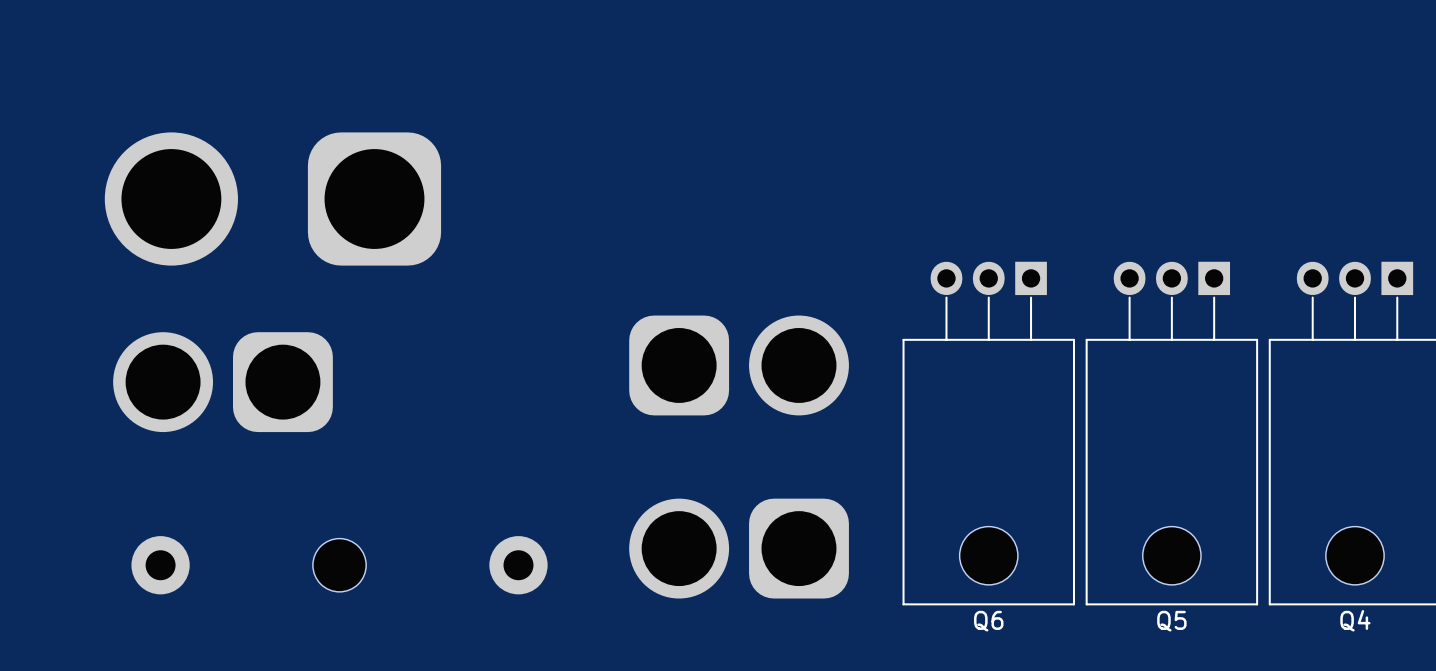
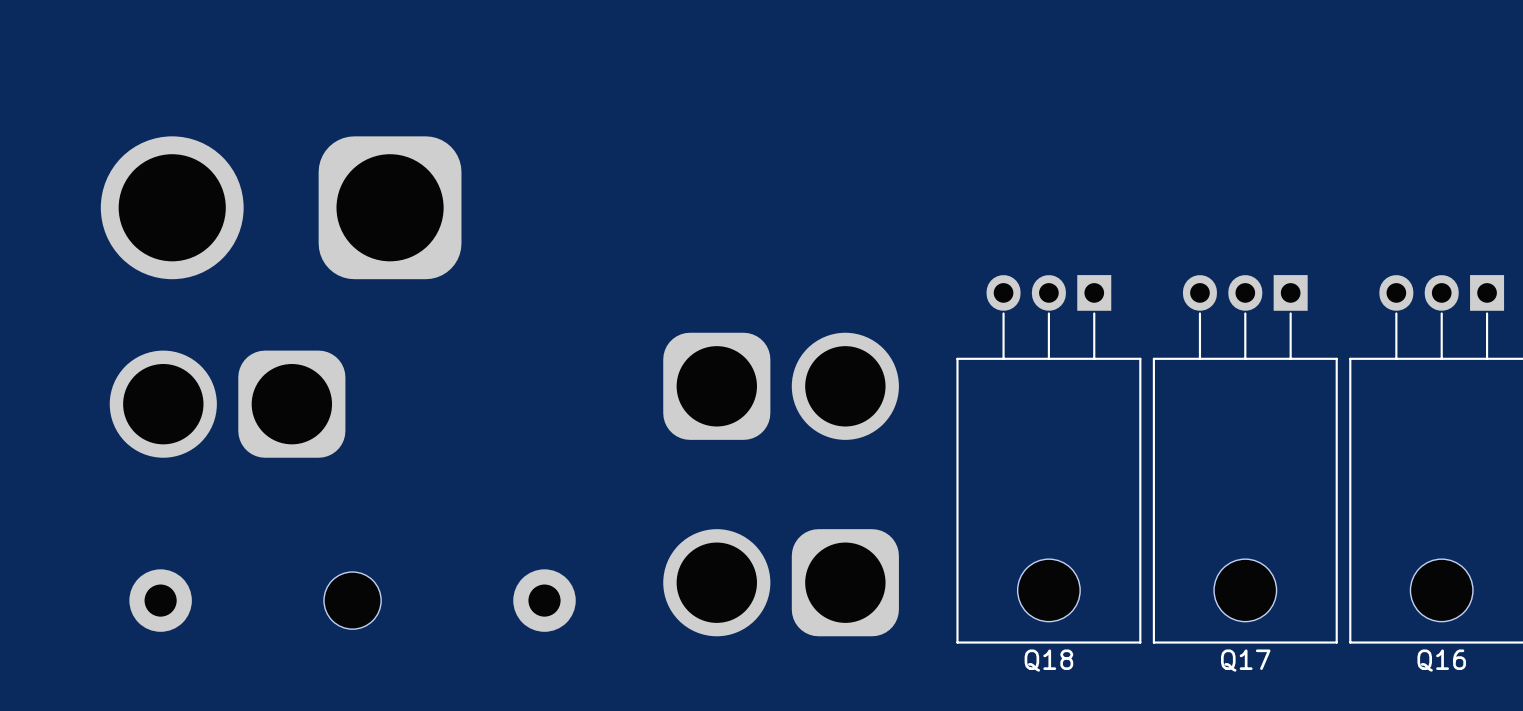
Q4 name: Q4 (1355, 620) -> Q16 (1441, 660)
Q6 name: Q6 (988, 621) -> Q18 (1048, 660)
Q5 name: Q5 (1171, 621) -> Q17 (1245, 660)

